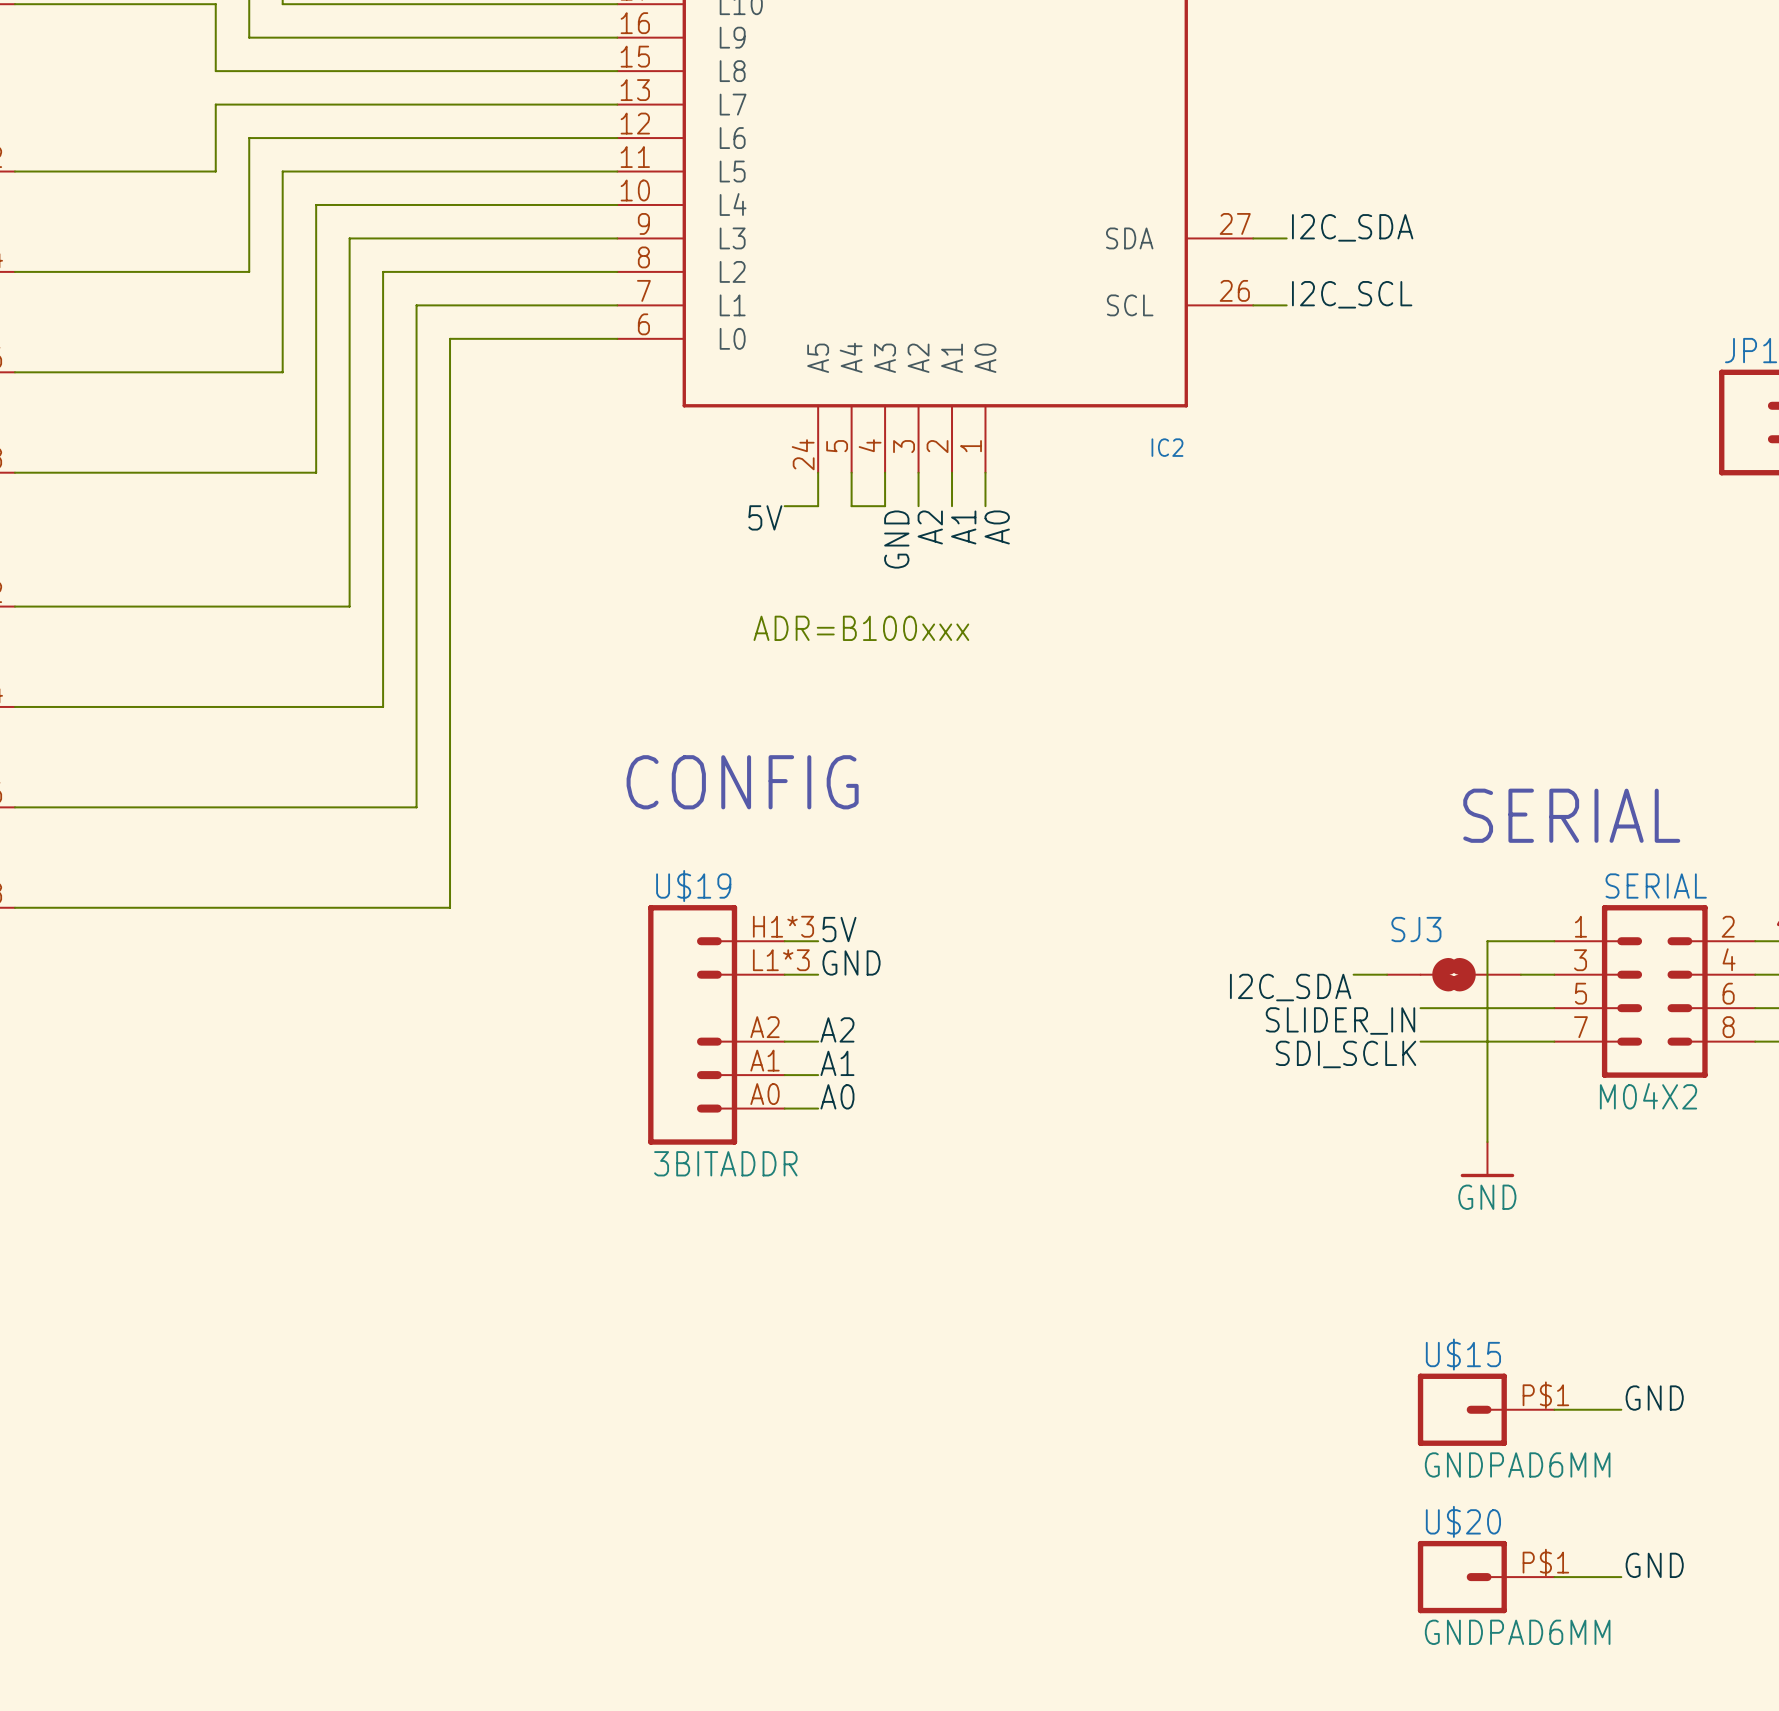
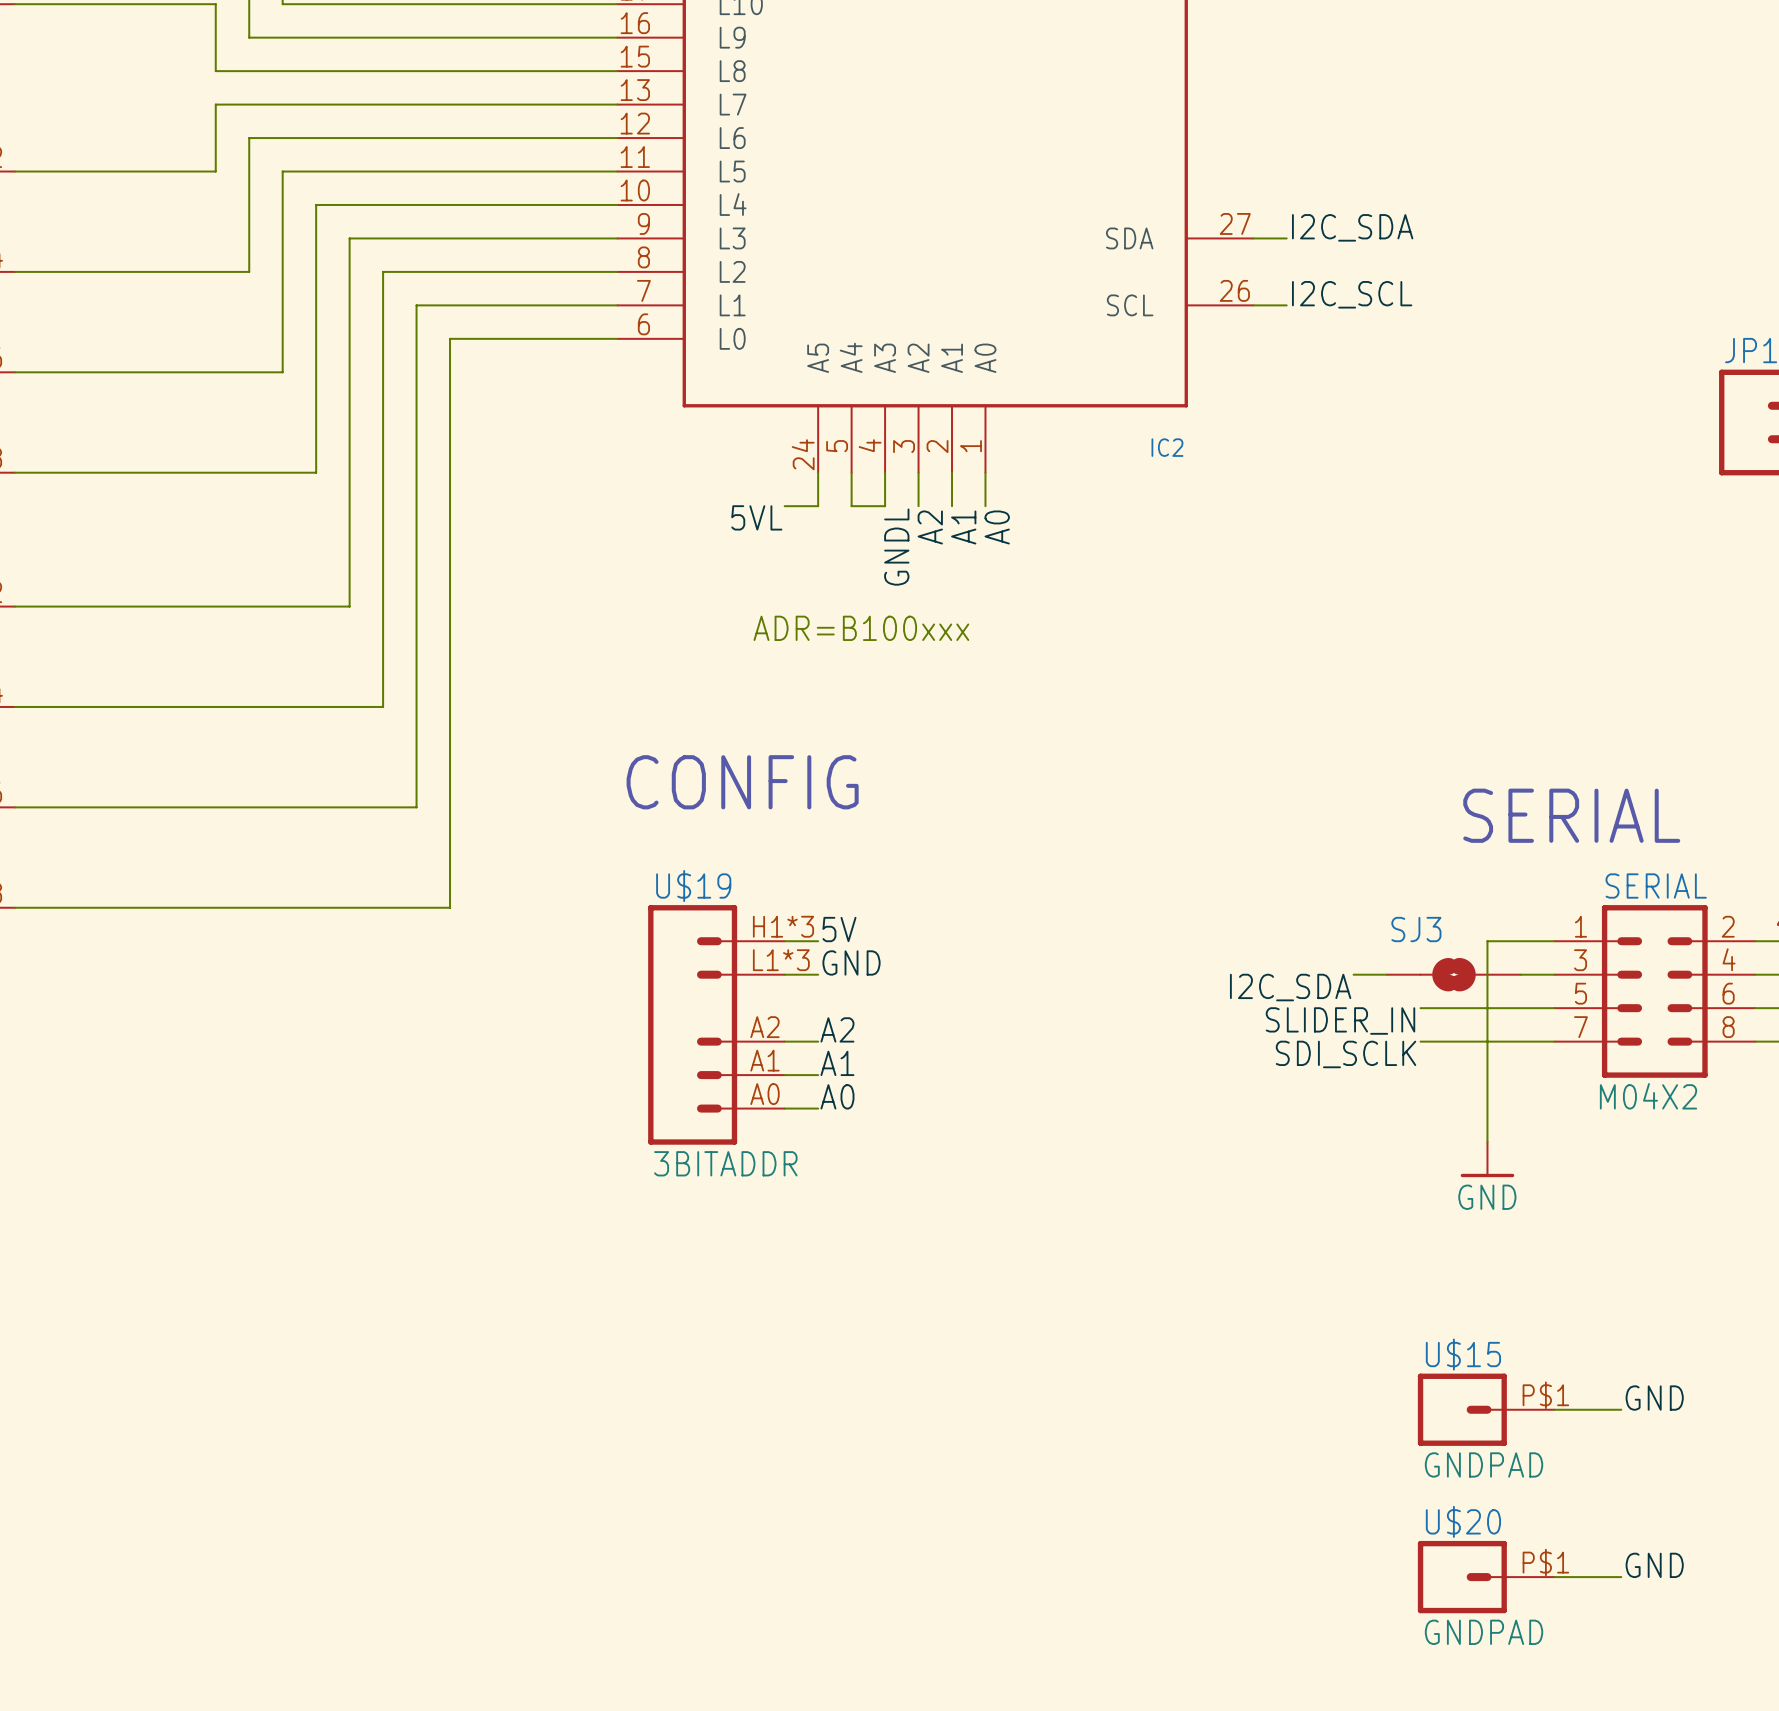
label: 5V (765, 517) -> 5VL (756, 517)
label: GND (896, 539) -> GNDL (896, 547)
U$15 value: GNDPAD6MM (1517, 1464) -> GNDPAD (1484, 1464)
U$20 value: GNDPAD6MM (1517, 1632) -> GNDPAD (1484, 1632)

